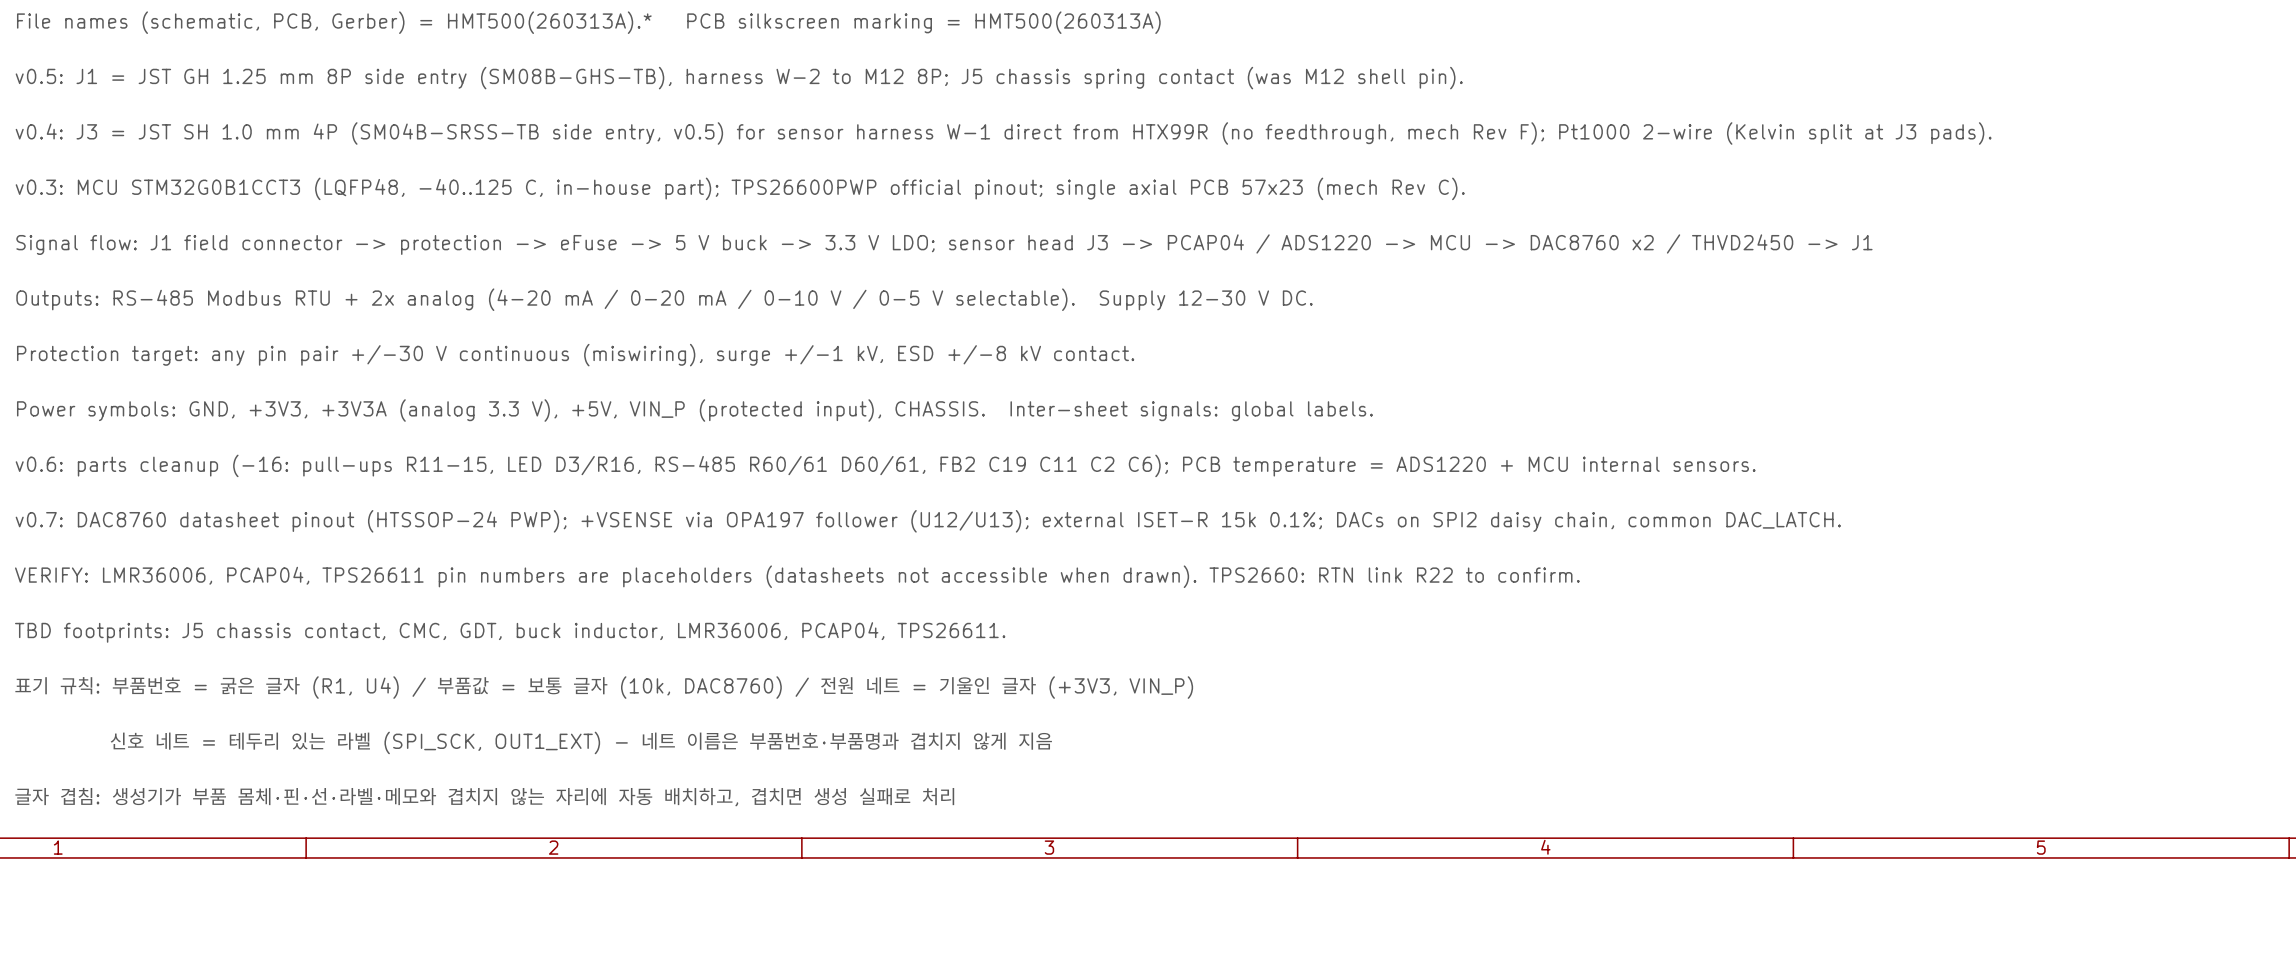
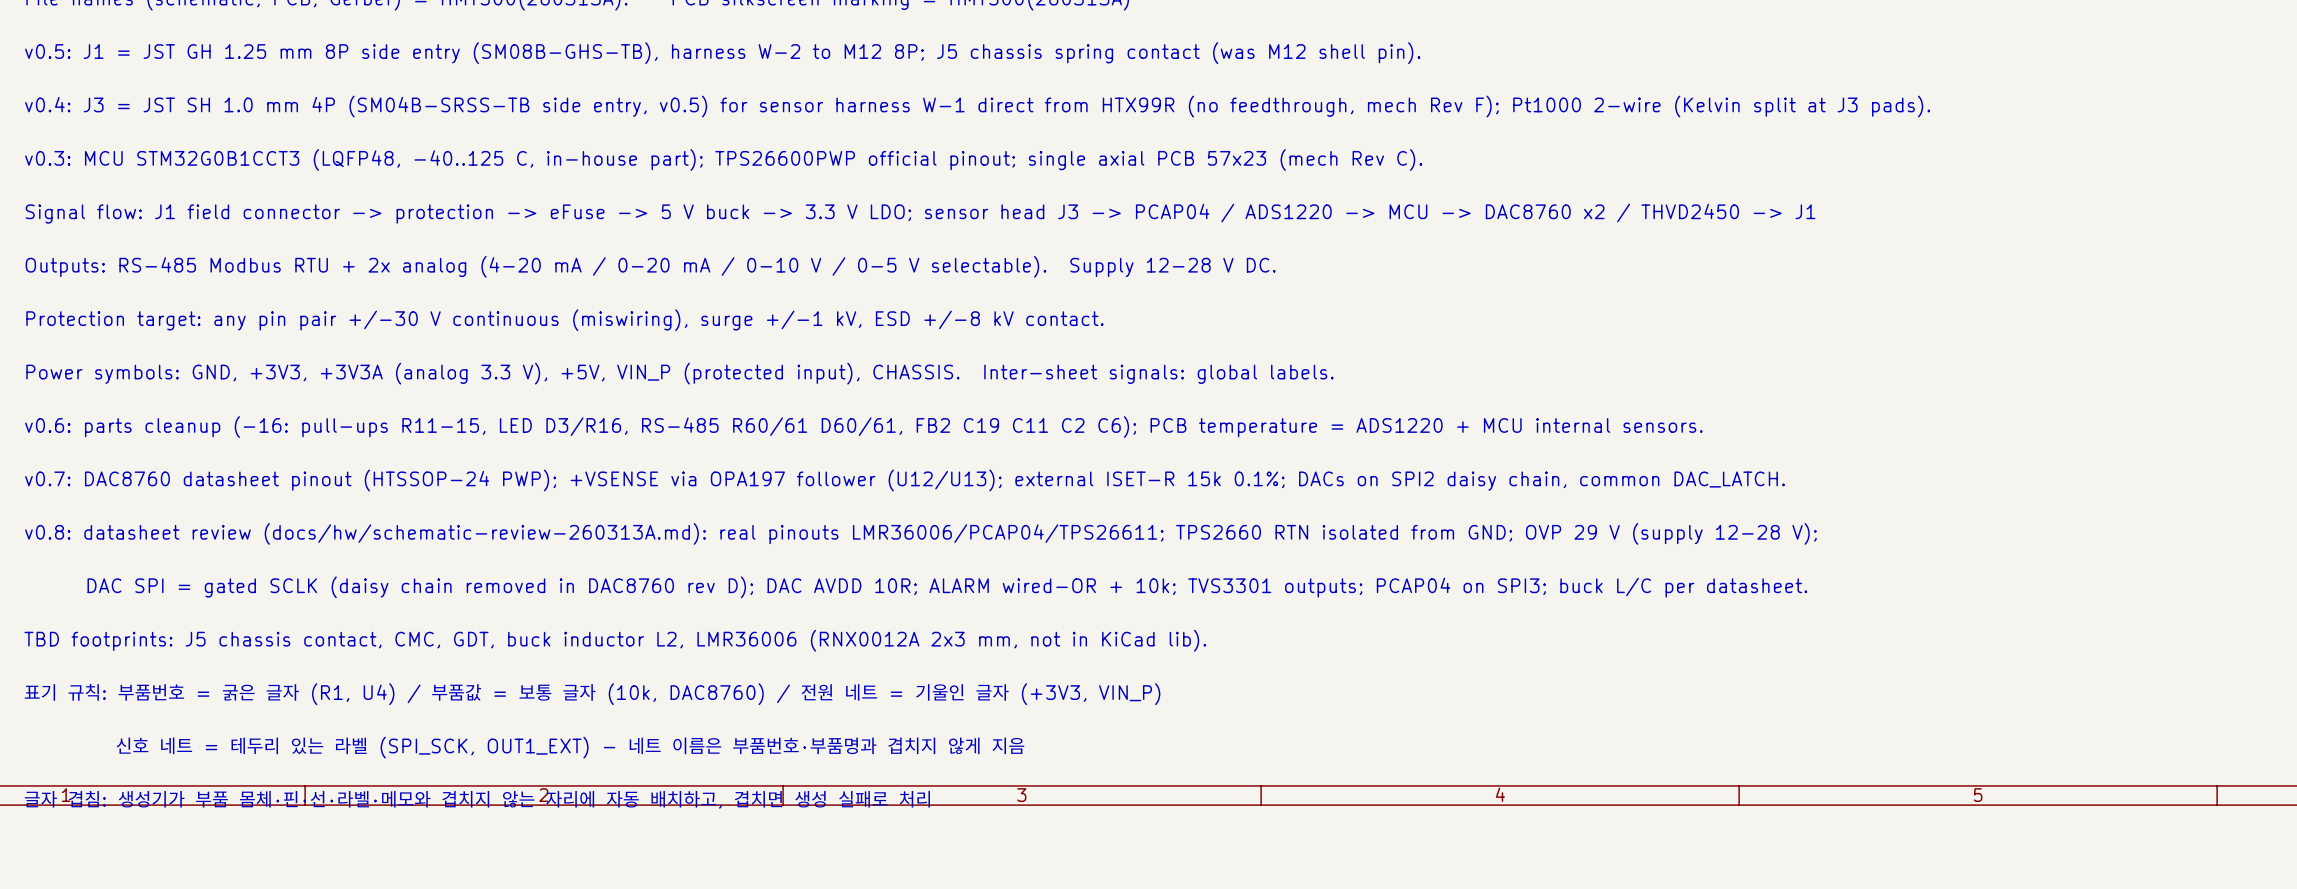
text: Outputs: RS-485 Modbus RTU + 2x analog (4-20 mA / 0-20 mA / 0-10 V / 0-5 V selectable). Supply 12-30 V DC. (664, 299) -> Outputs: RS-485 Modbus RTU + 2x analog (4-20 mA / 0-20 mA / 0-10 V / 0-5 V selectable). Supply 12-28 V DC. (650, 266)
text: VERIFY: LMR36006, PCAP04, TPS26611 pin numbers are placeholders (datasheets not accessible when drawn). TPS2660: RTN link R22 to confirm. (797, 576) -> v0.8: datasheet review (docs/hw/schematic-review-260313A.md): real pinouts LMR36006/PCAP04/TPS26611; TPS2660 RTN isolated from GND; OVP 29 V (supply 12-28 V); (920, 533)
text: TBD footprints: J5 chassis contact, CMC, GDT, buck inductor, LMR36006, PCAP04, TPS26611. (510, 632) -> DAC SPI = gated SCLK (daisy chain removed in DAC8760 rev D); DAC AVDD 10R; ALARM wired-OR + 10k; TVS3301 outputs; PCAP04 on SPI3; buck L/C per datasheet. (947, 587)
text: 표기 규칙: 부품번호 = 굵은 글자 (R1, U4) / 부품값 = 보통 글자 (10k, DAC8760) / 전원 네트 = 기울인 글자 (+3V3, VIN_P) (603, 687) -> TBD footprints: J5 chassis contact, CMC, GDT, buck inductor L2, LMR36006 (RNX0012A 2x3 mm, not in KiCad lib). (615, 640)
text: 신호 네트 = 테두리 있는 라벨 (SPI_SCK, OUT1_EXT) - 네트 이름은 부품번호·부품명과 겹치지 않게 지음 (581, 742) -> 표기 규칙: 부품번호 = 굵은 글자 (R1, U4) / 부품값 = 보통 글자 (10k, DAC8760) / 전원 네트 = 기울인 글자 (+3V3, VIN_P) (592, 694)
text: 글자 겹침: 생성기가 부품 몸체·핀·선·라벨·메모와 겹치지 않는 자리에 자동 배치하고, 겹치면 생성 실패로 처리 (484, 796) -> 신호 네트 = 테두리 있는 라벨 (SPI_SCK, OUT1_EXT) - 네트 이름은 부품번호·부품명과 겹치지 않게 지음 (570, 747)
text: none -> 글자 겹침: 생성기가 부품 몸체·핀·선·라벨·메모와 겹치지 않는 자리에 자동 배치하고, 겹치면 생성 실패로 처리 (477, 799)

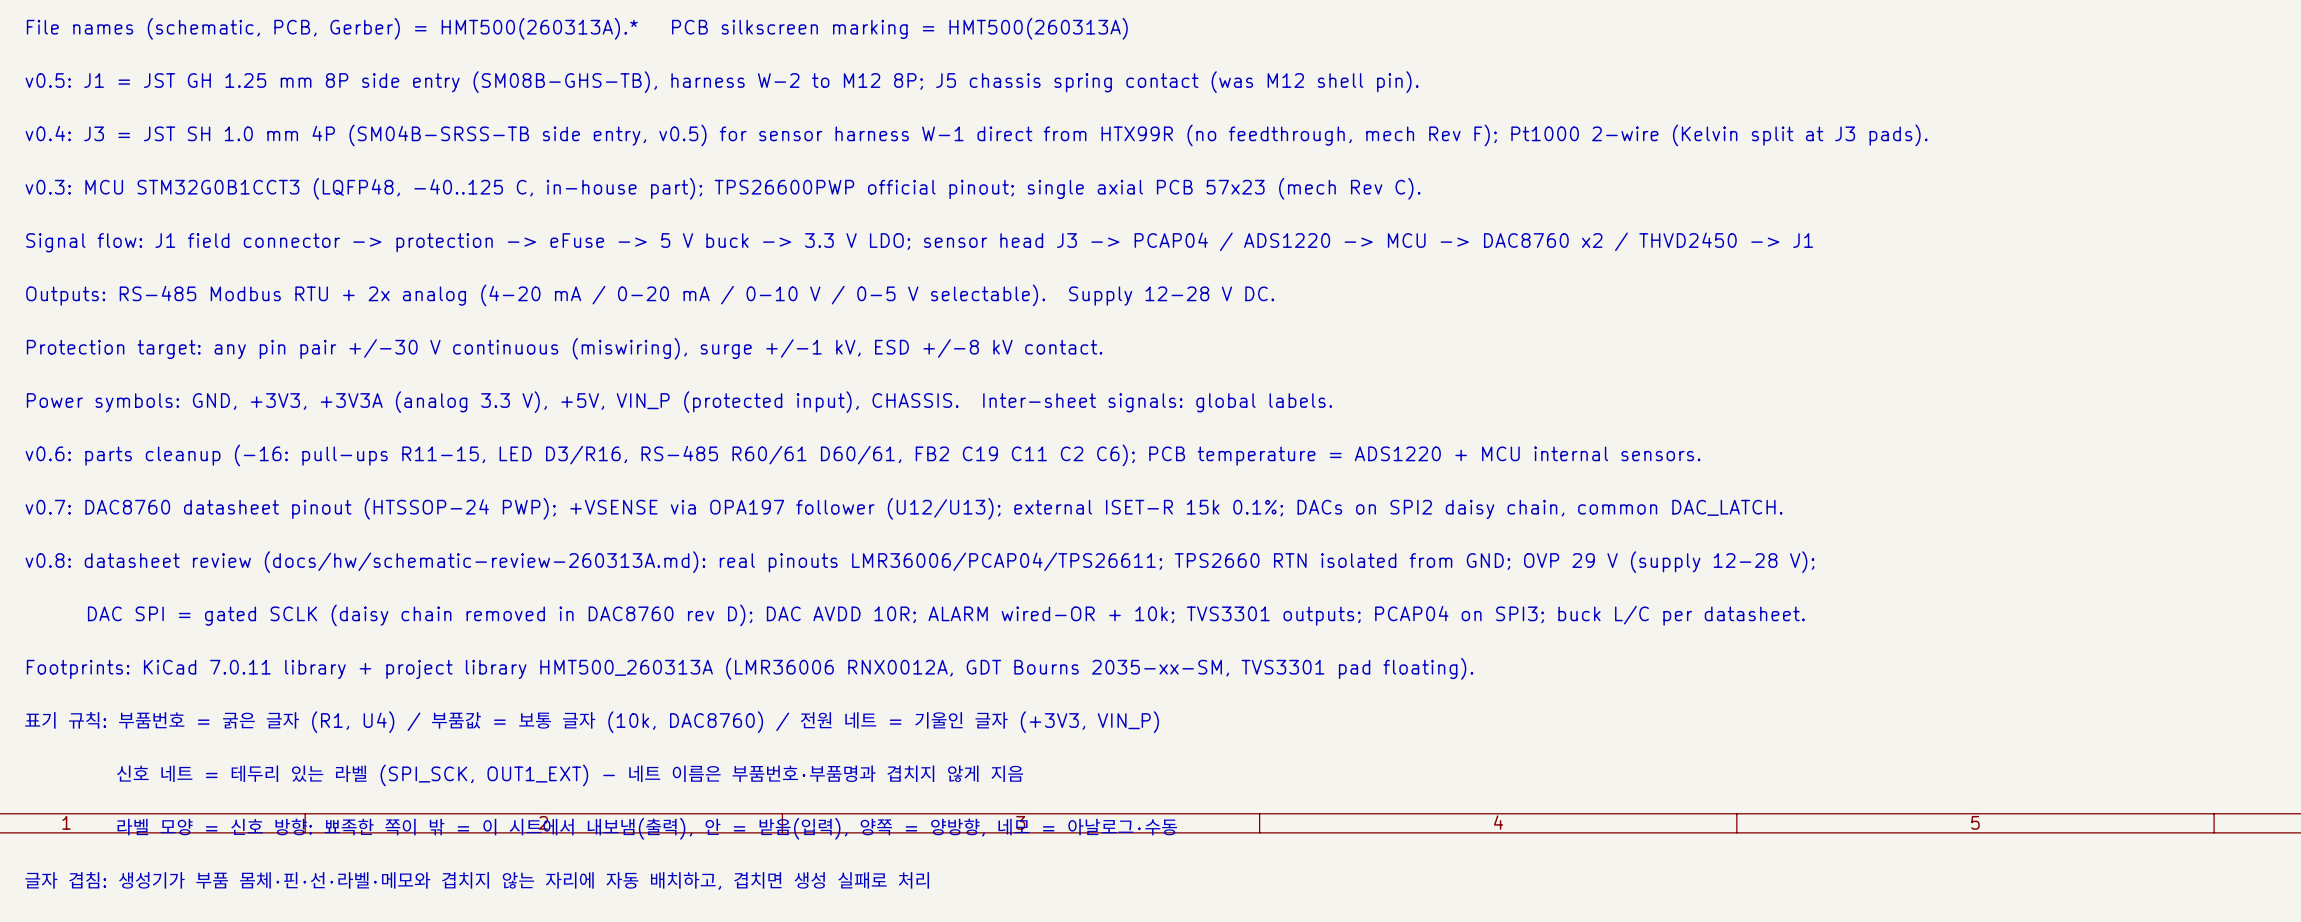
text: TBD footprints: J5 chassis contact, CMC, GDT, buck inductor L2, LMR36006 (RNX0012A 2x3 mm, not in KiCad lib). (615, 640) -> Footprints: KiCad 7.0.11 library + project library HMT500_260313A (LMR36006 RNX0012A, GDT Bourns 2035-xx-SM, TVS3301 pad floating). (750, 668)
text: 글자 겹침: 생성기가 부품 몸체·핀·선·라벨·메모와 겹치지 않는 자리에 자동 배치하고, 겹치면 생성 실패로 처리 (477, 799) -> 라벨 모양 = 신호 방향: 뾰족한 쪽이 밖 = 이 시트에서 내보냄(출력), 안 = 받음(입력), 양쪽 = 양방향, 네모 = 아날로그·수동 (647, 828)
text: none -> 글자 겹침: 생성기가 부품 몸체·핀·선·라벨·메모와 겹치지 않는 자리에 자동 배치하고, 겹치면 생성 실패로 처리 (477, 880)

